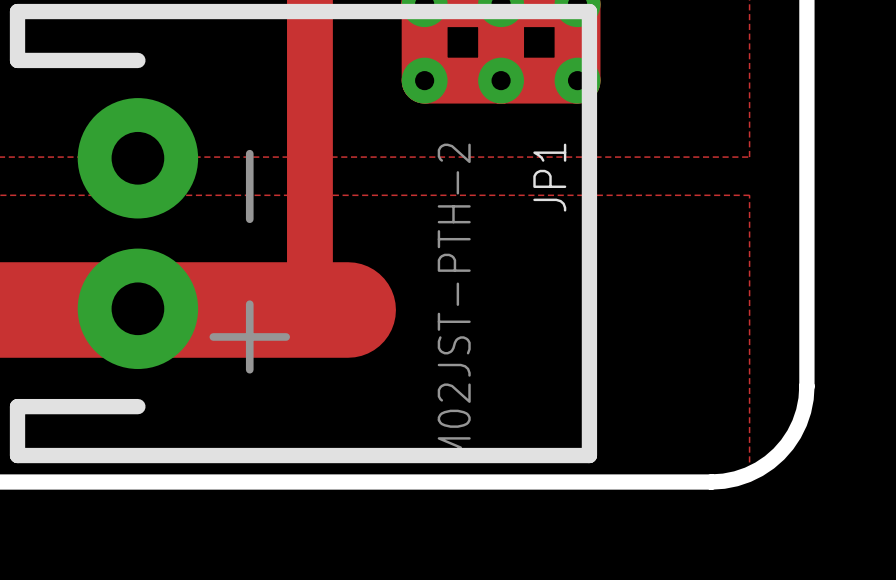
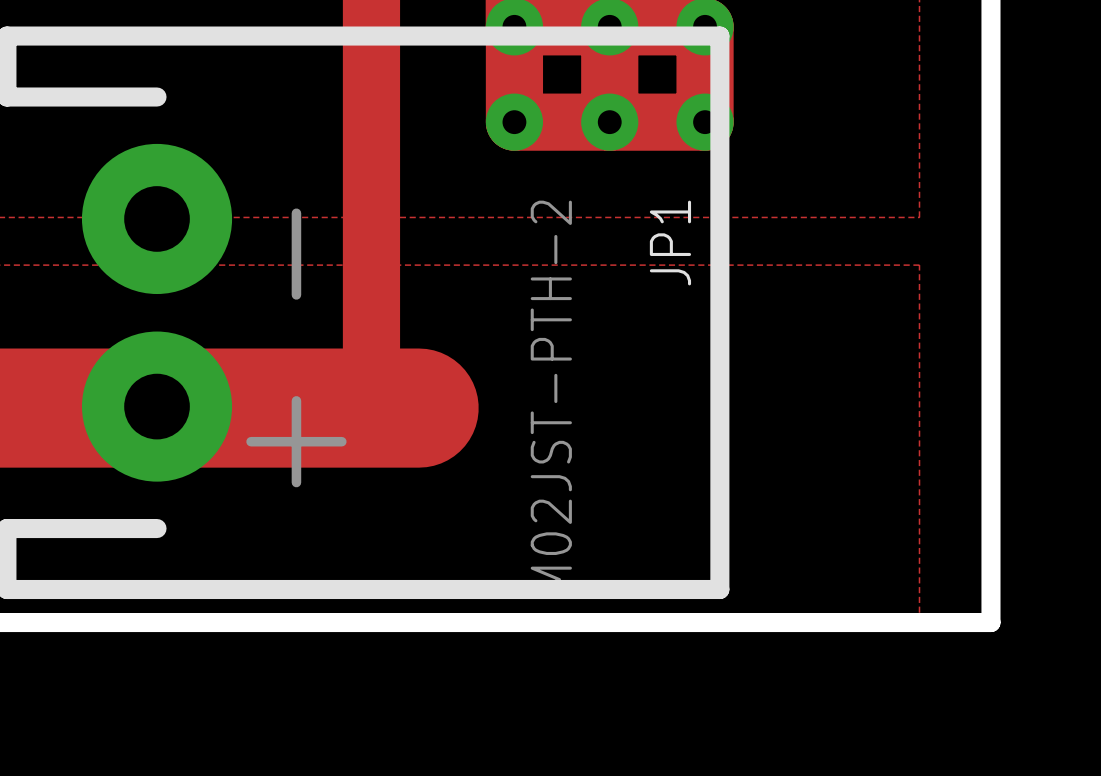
board edge: (806, 386) (803, 411) (799, 423) (794, 434) (778, 454) (759, 469) (747, 474) (736, 478) (711, 482) -> (990, 503) (990, 622) (871, 622)

